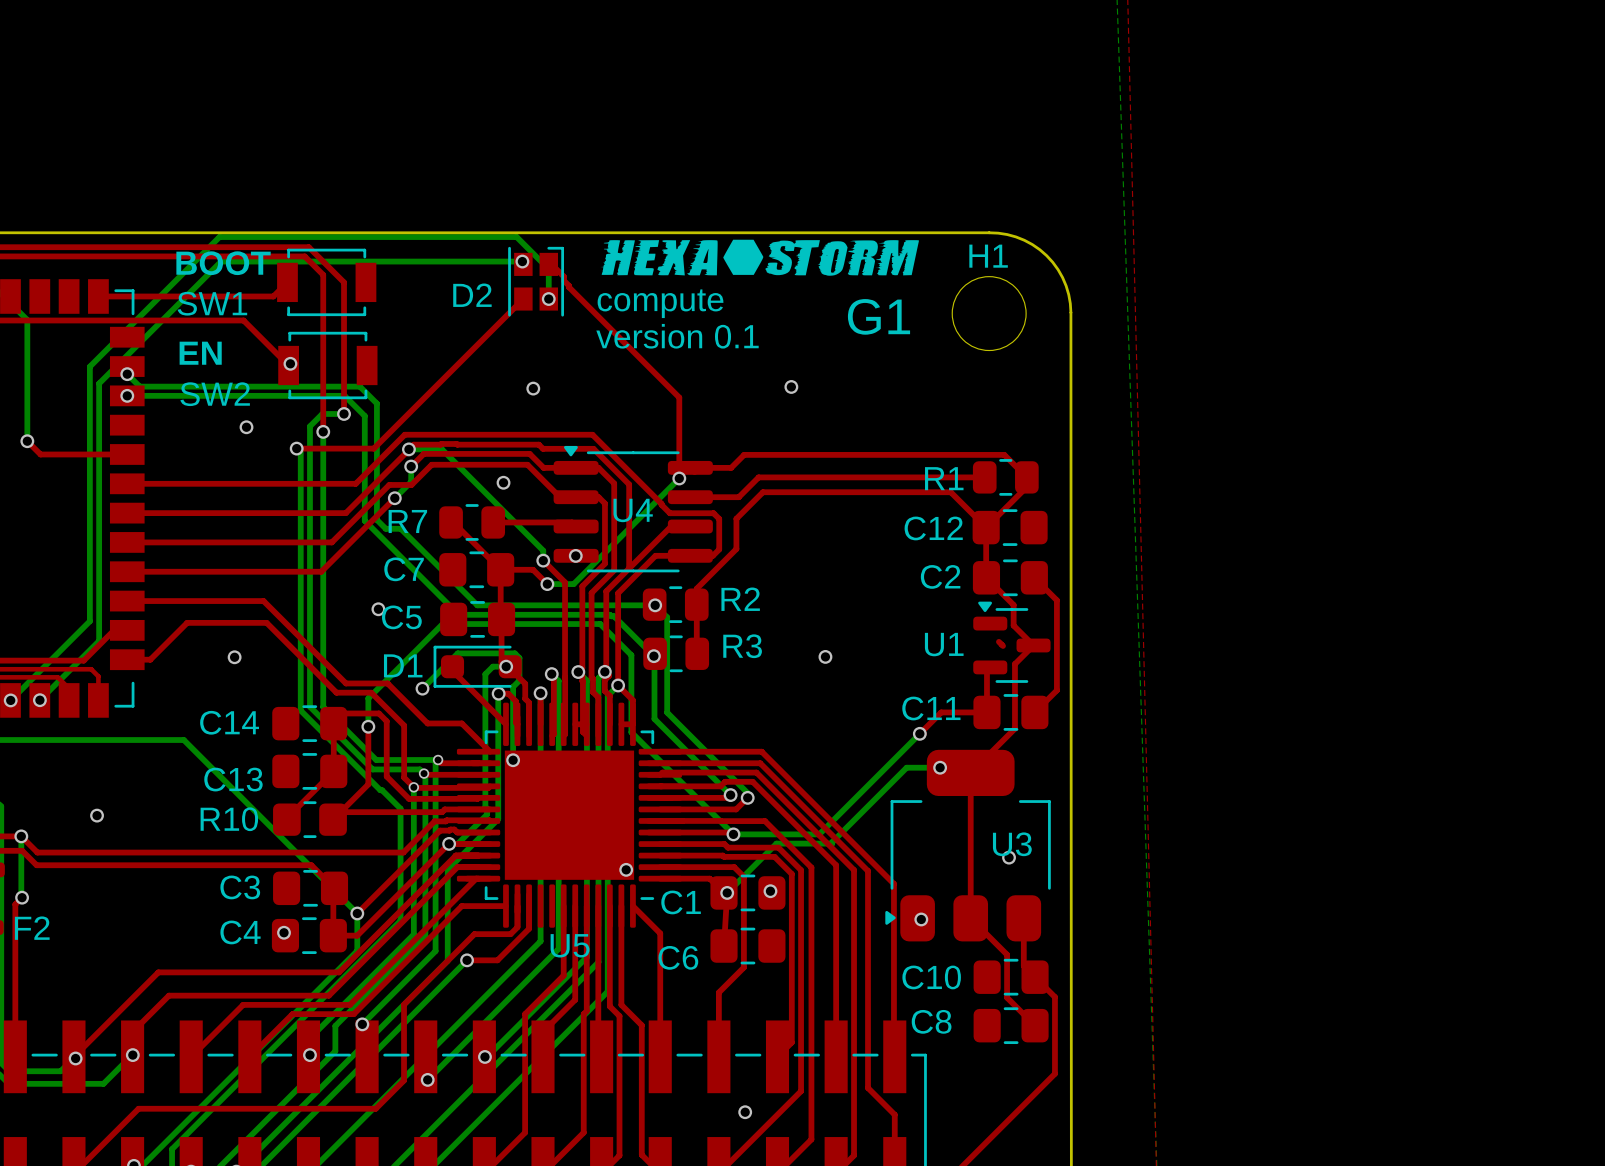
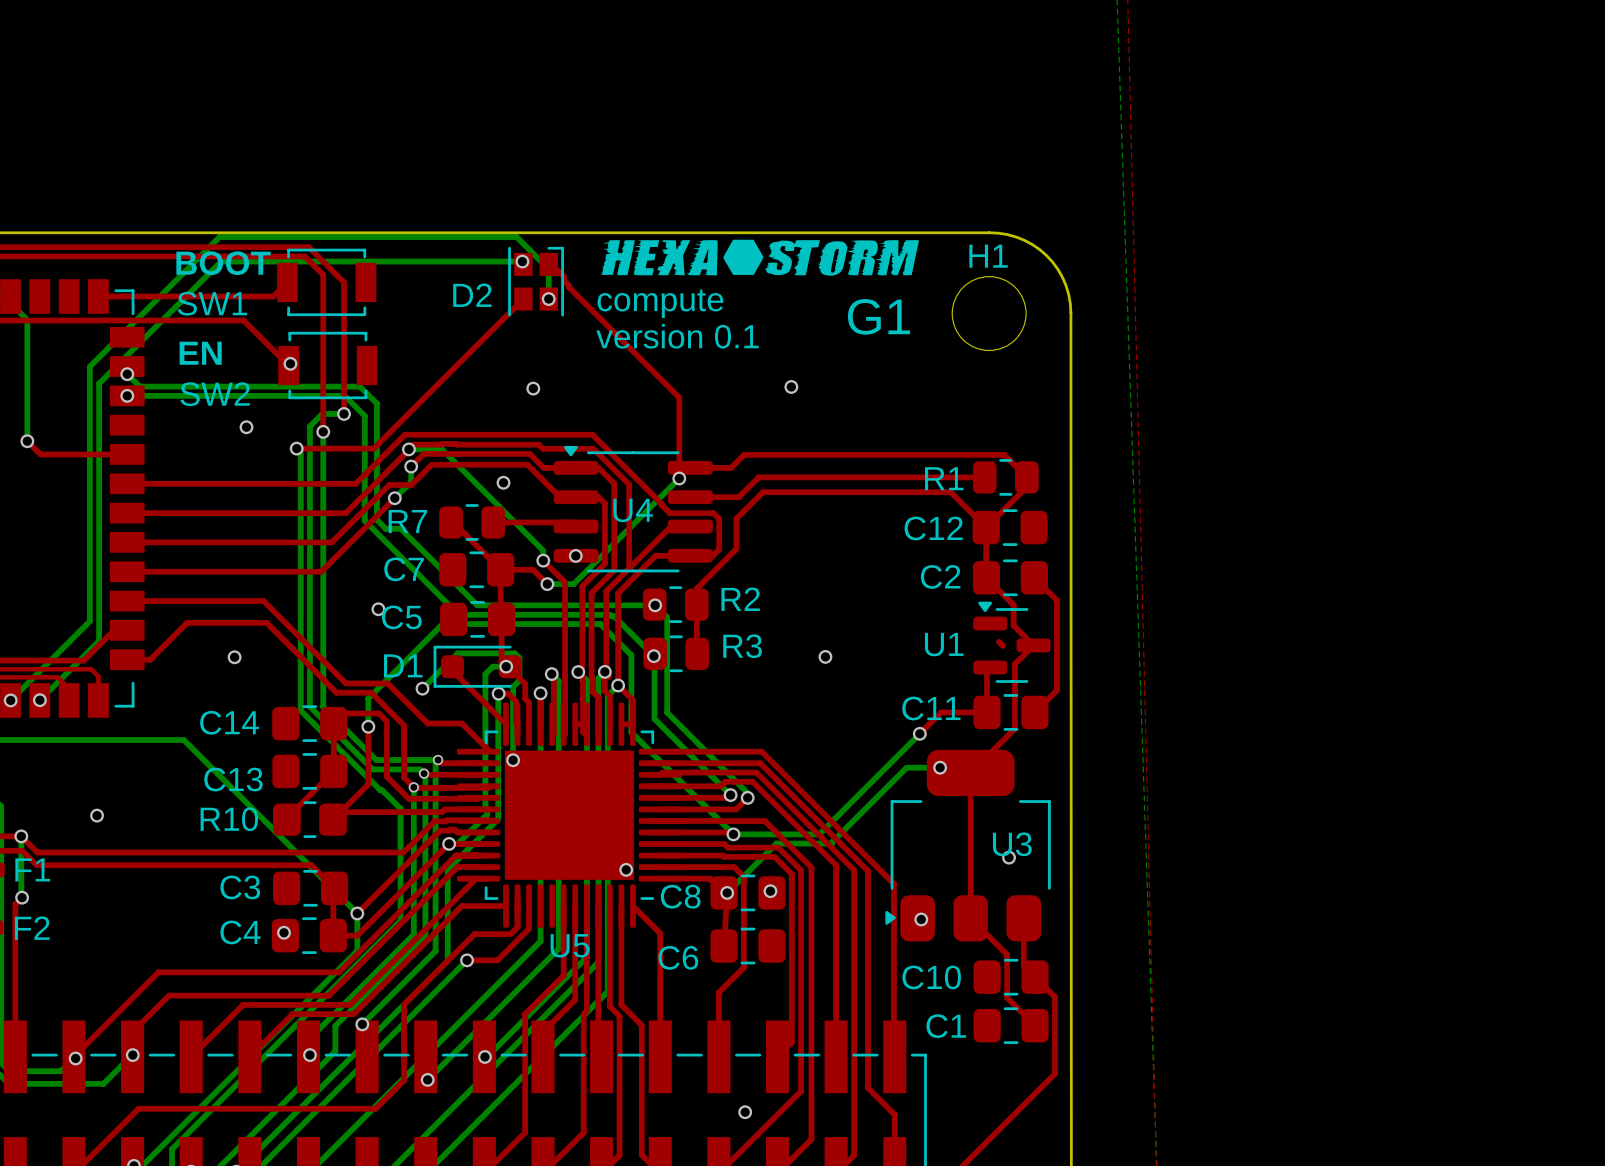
F1 name: none -> F1 (32, 869)
C1 name: C1 (681, 902) -> C8 (680, 896)
C8 name: C8 (931, 1021) -> C1 (946, 1026)

